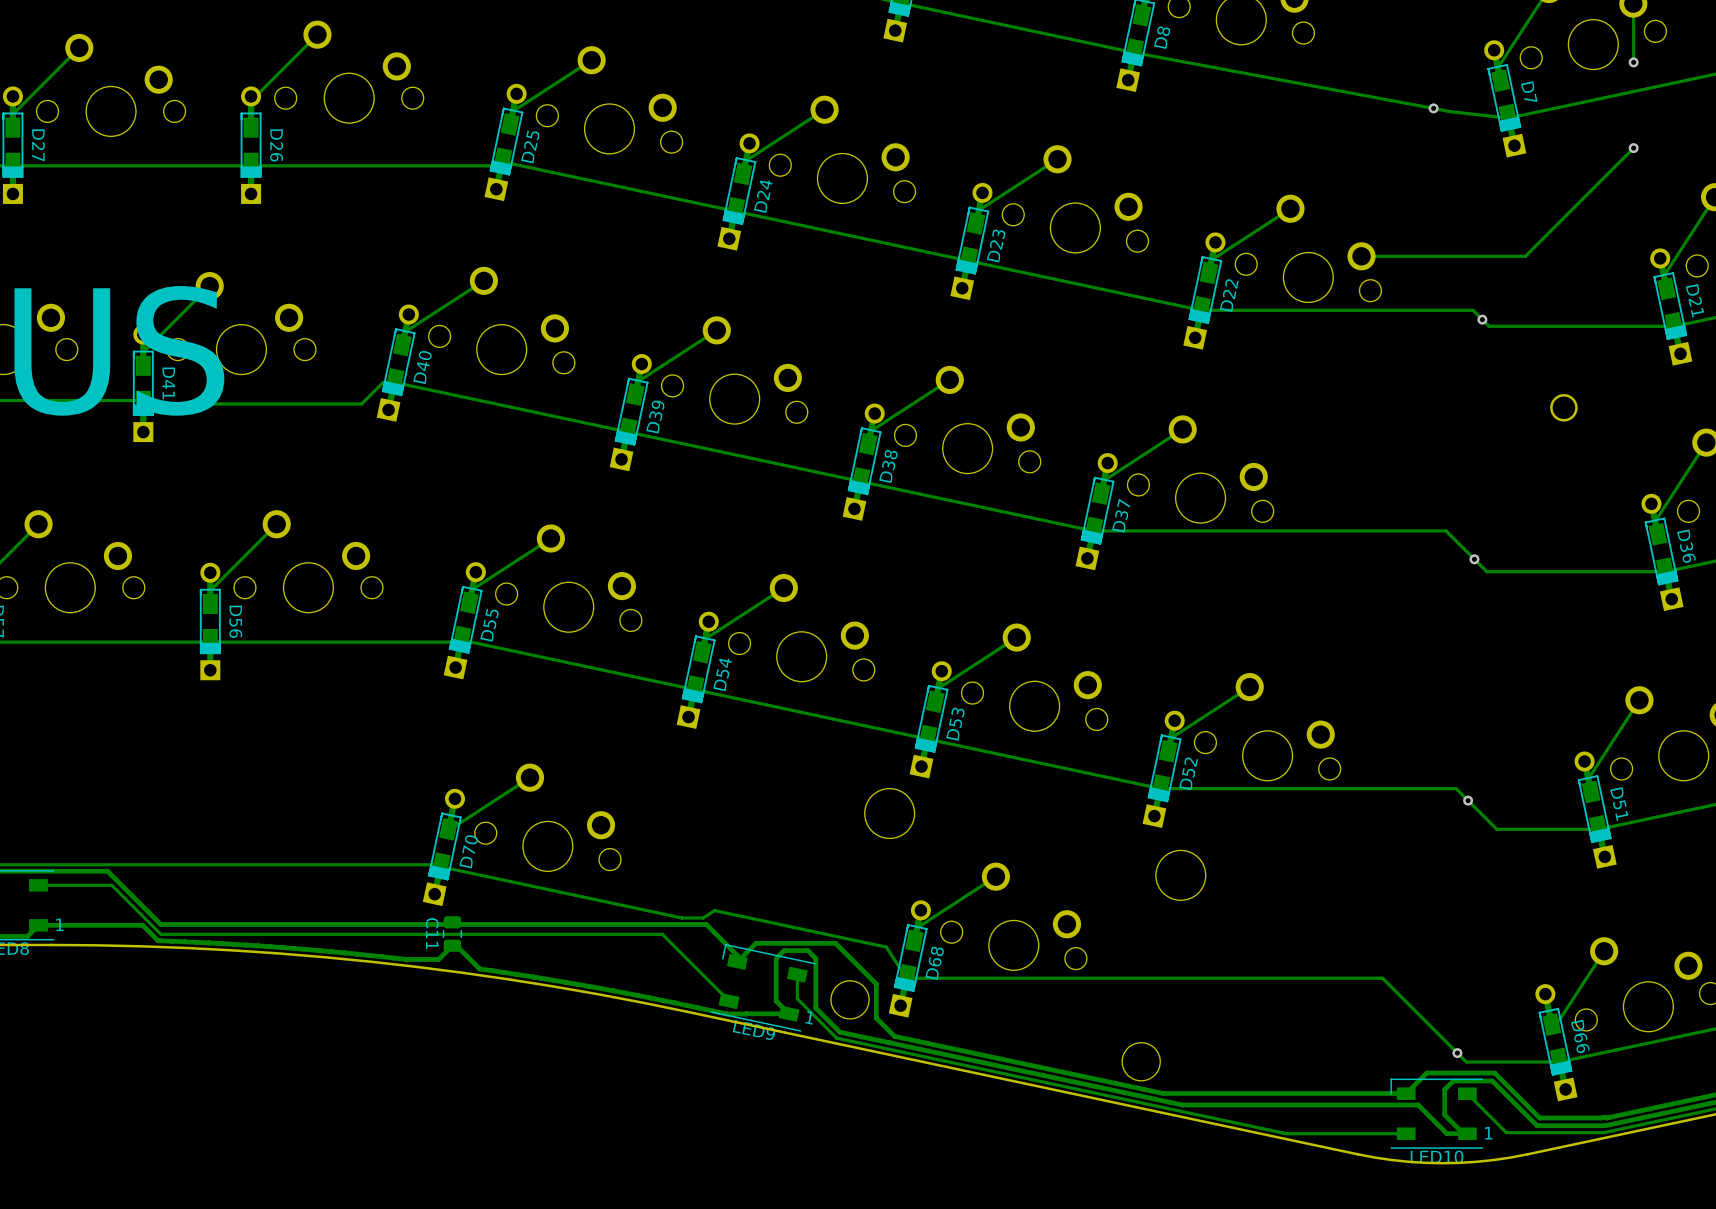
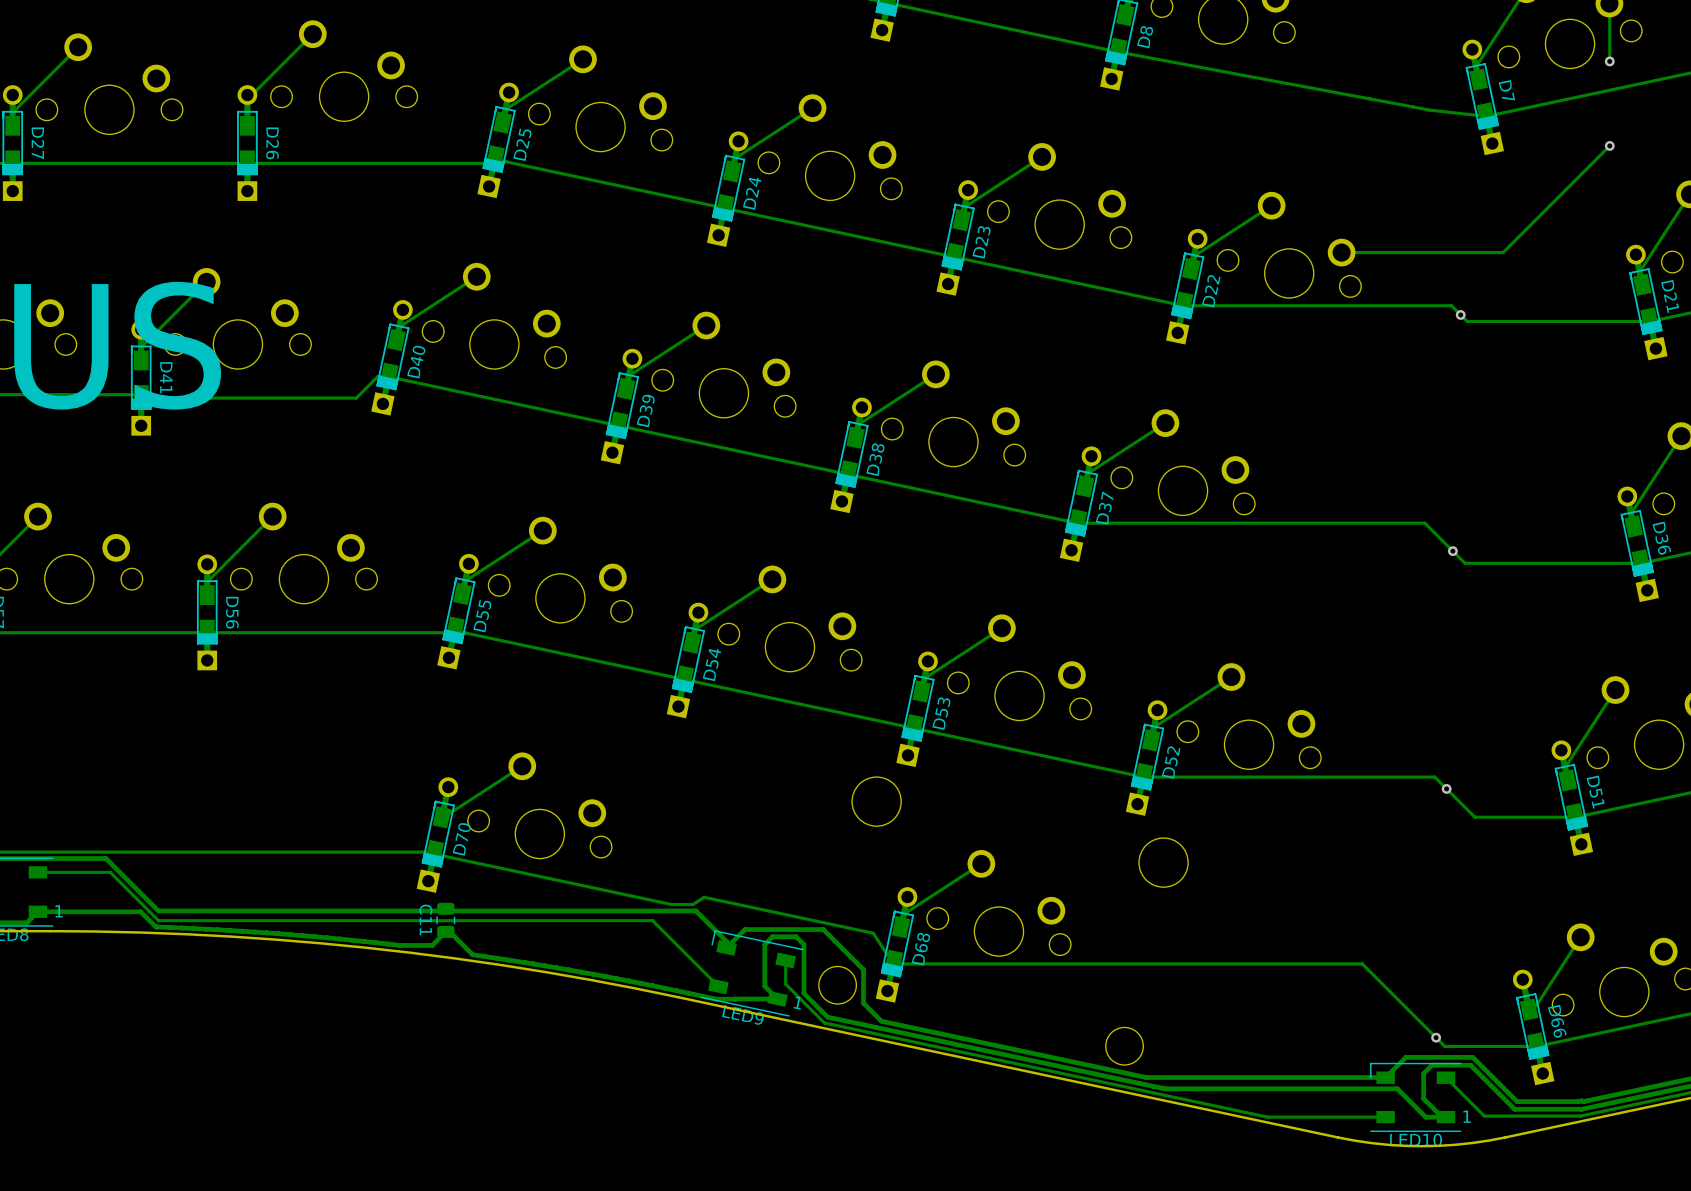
via: (1433, 108) -> none
round board edge: [1550, 394, 1578, 422] -> none

